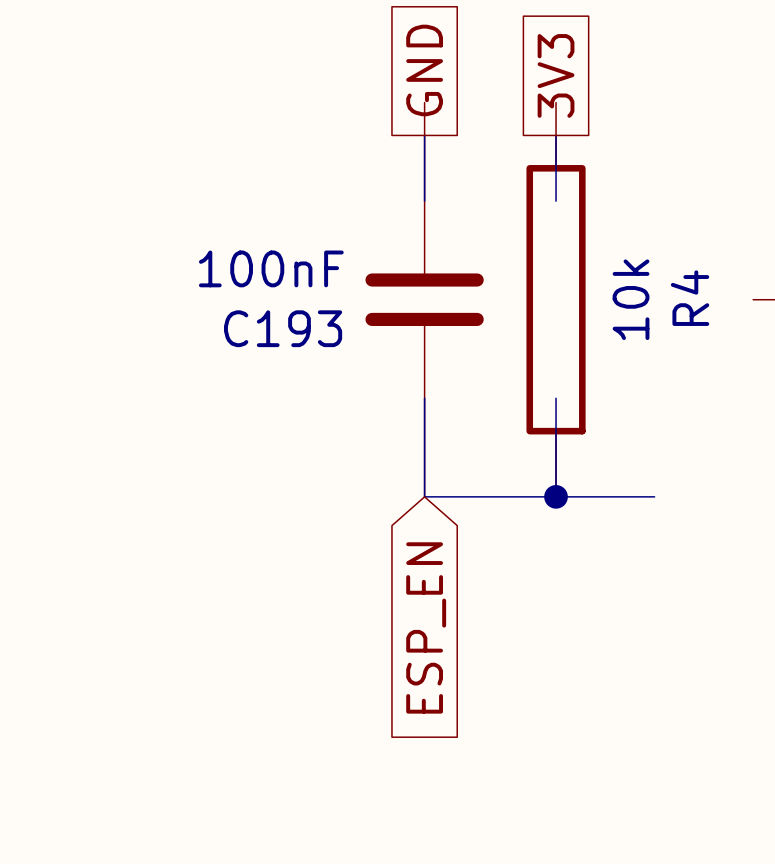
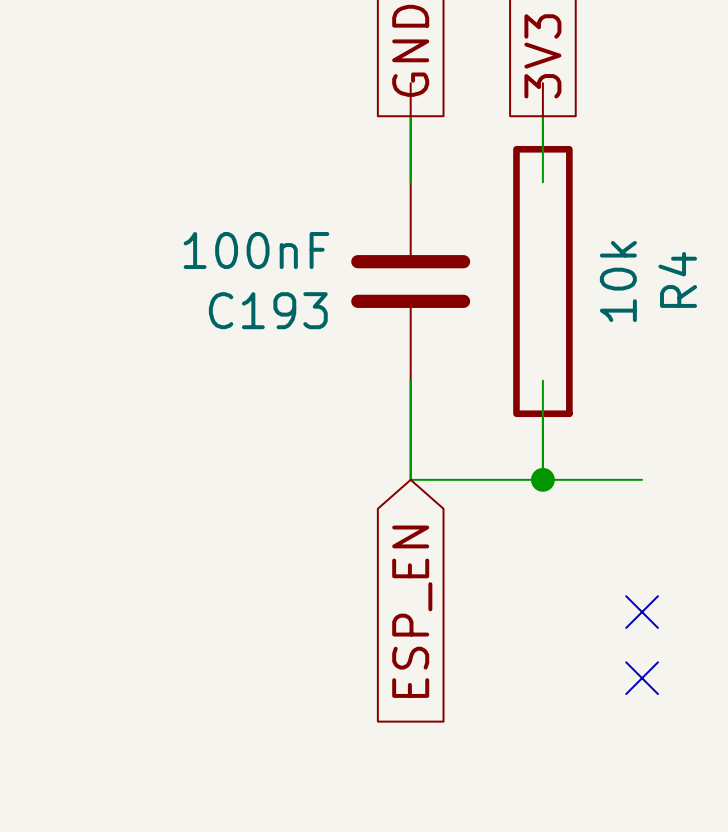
no-connect mark: none -> (642, 612)
no-connect mark: none -> (642, 678)

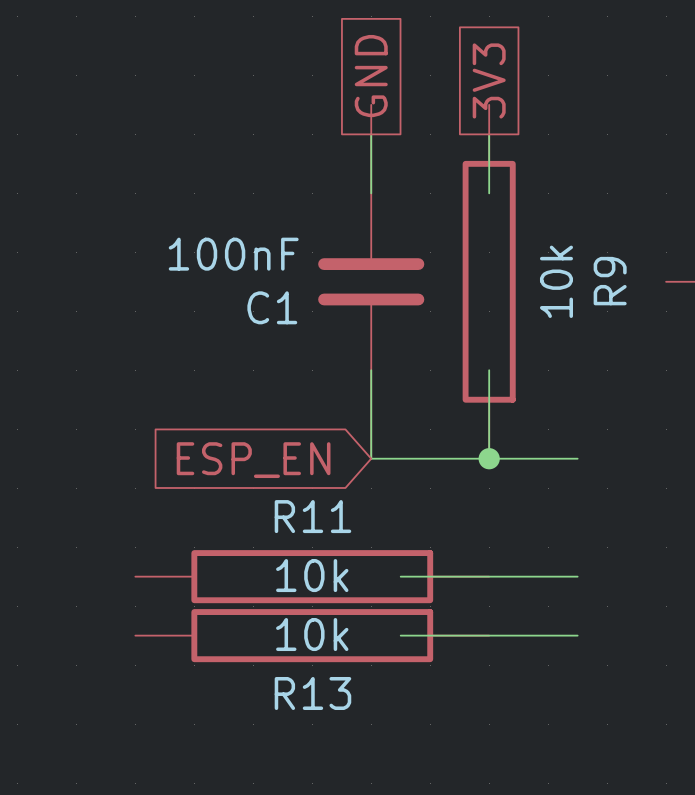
R4 name: R4 (677, 279) -> R9 (610, 281)
C193 name: C193 (268, 310) -> C1 (272, 307)
global label rotation: 0° (412, 611) -> 90° clockwise (253, 460)
R11: none -> 10k (312, 576)
wire: none -> (400, 576) (577, 576)
no-connect mark: (642, 612) -> none
R13: none -> 10k (312, 635)
wire: none -> (400, 635) (577, 635)
no-connect mark: (642, 678) -> none

